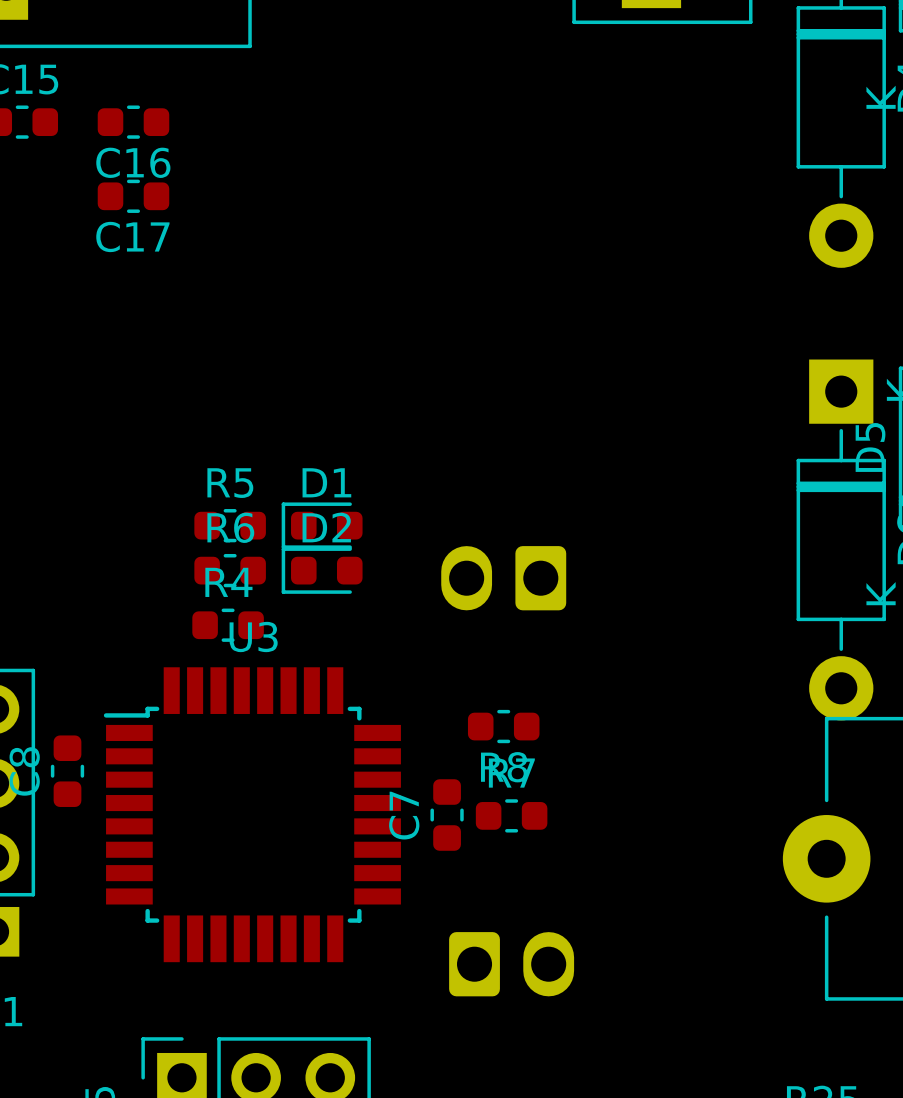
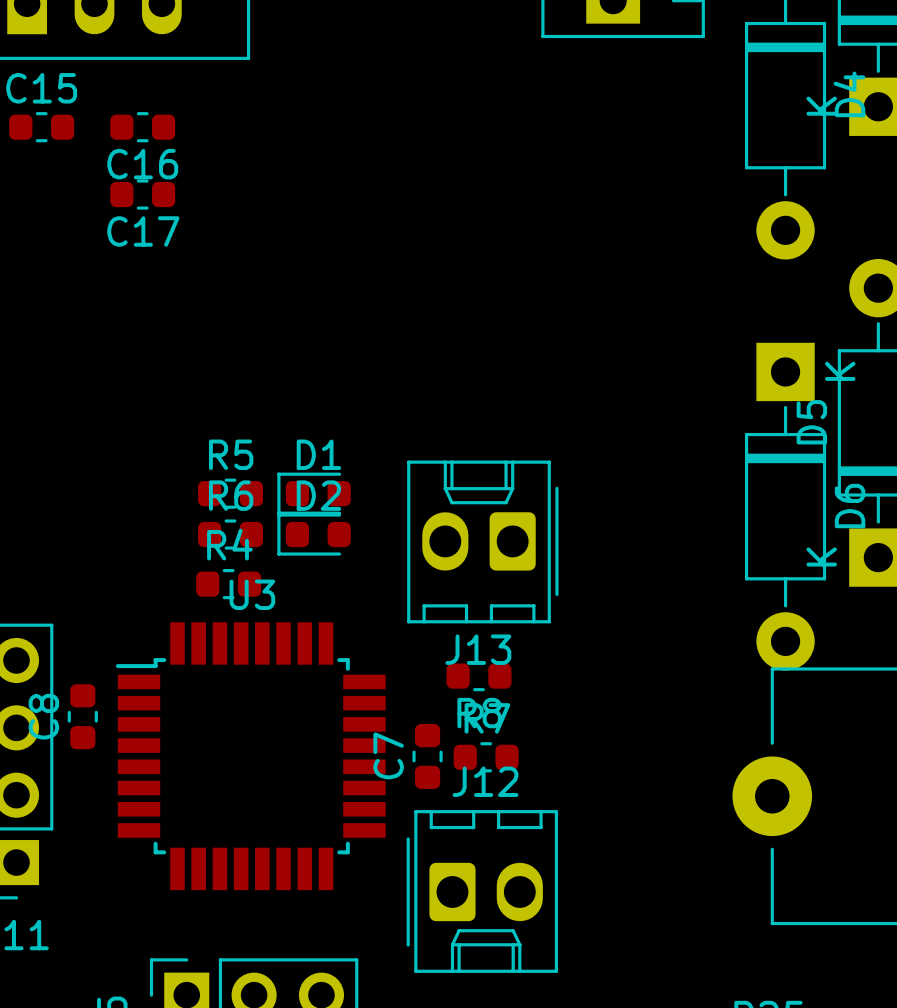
J13 side: bottom (503, 578) -> top (482, 541)
J12 side: bottom (511, 964) -> top (482, 891)

